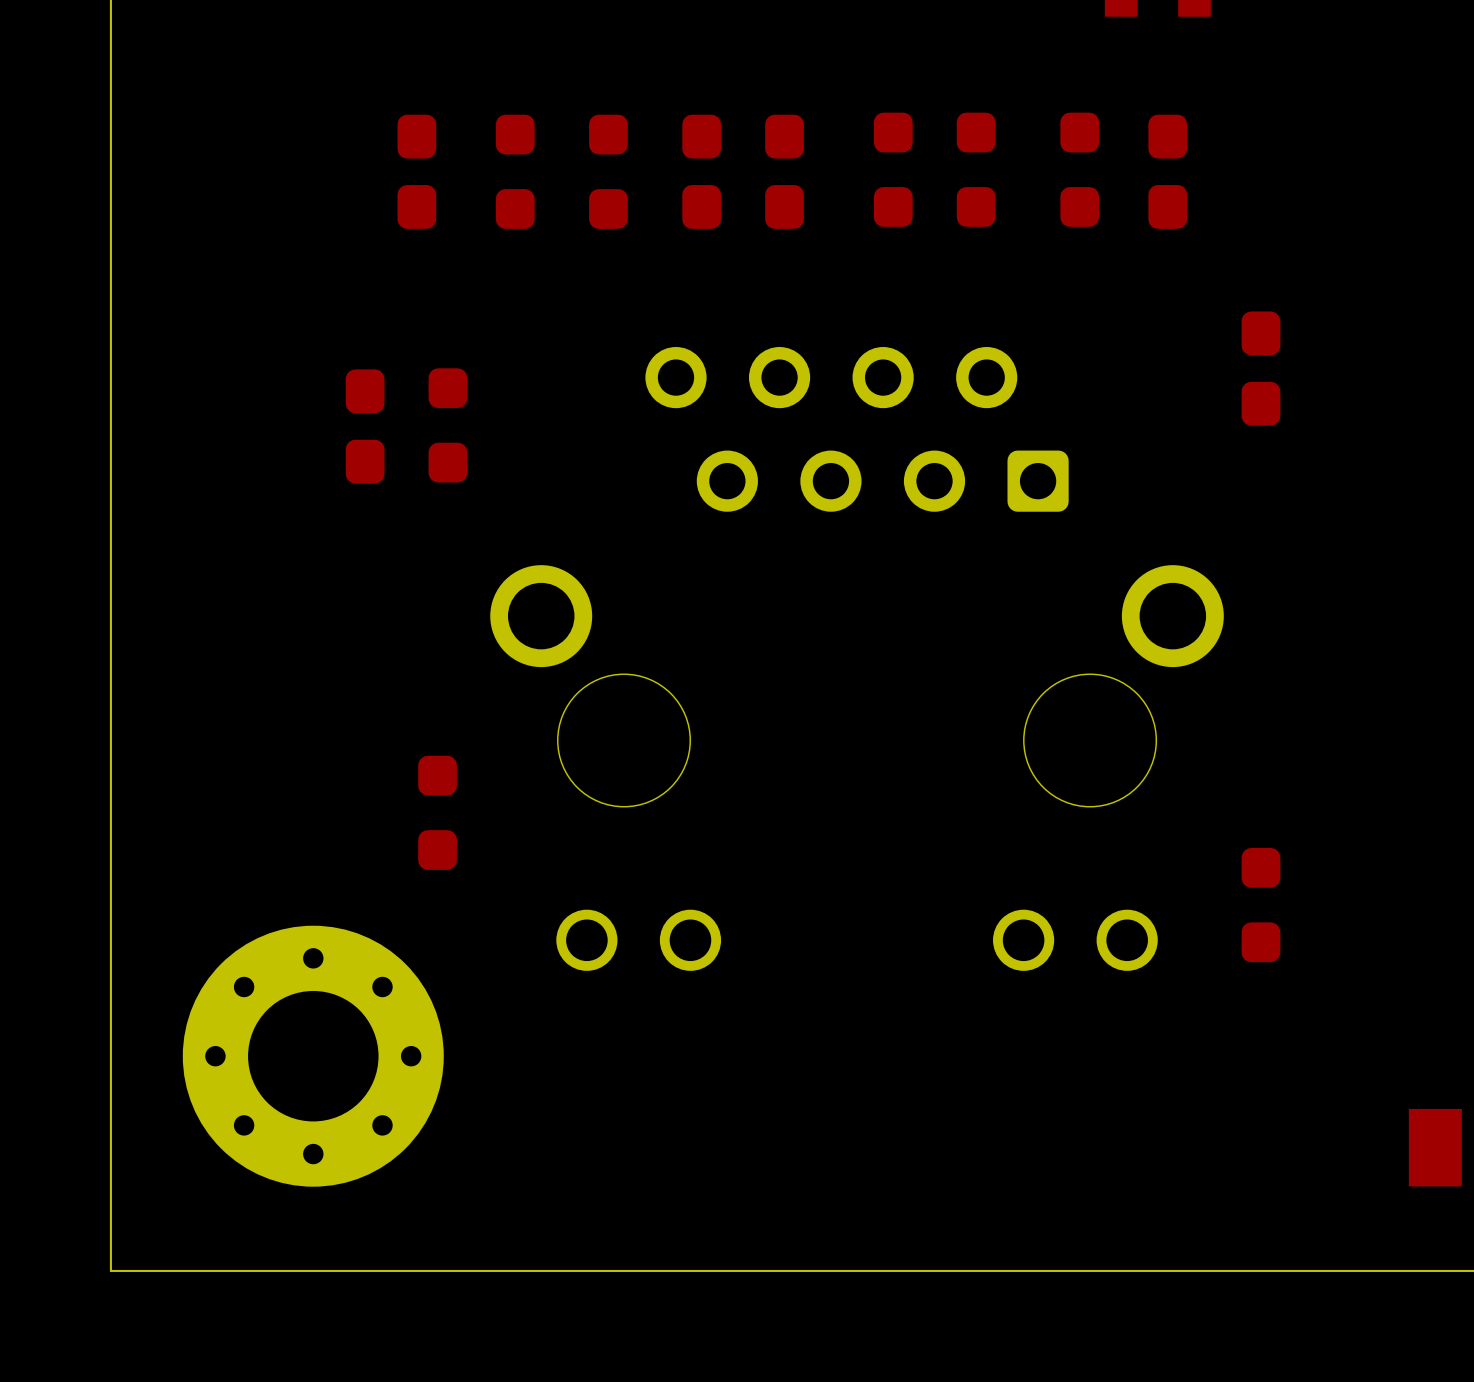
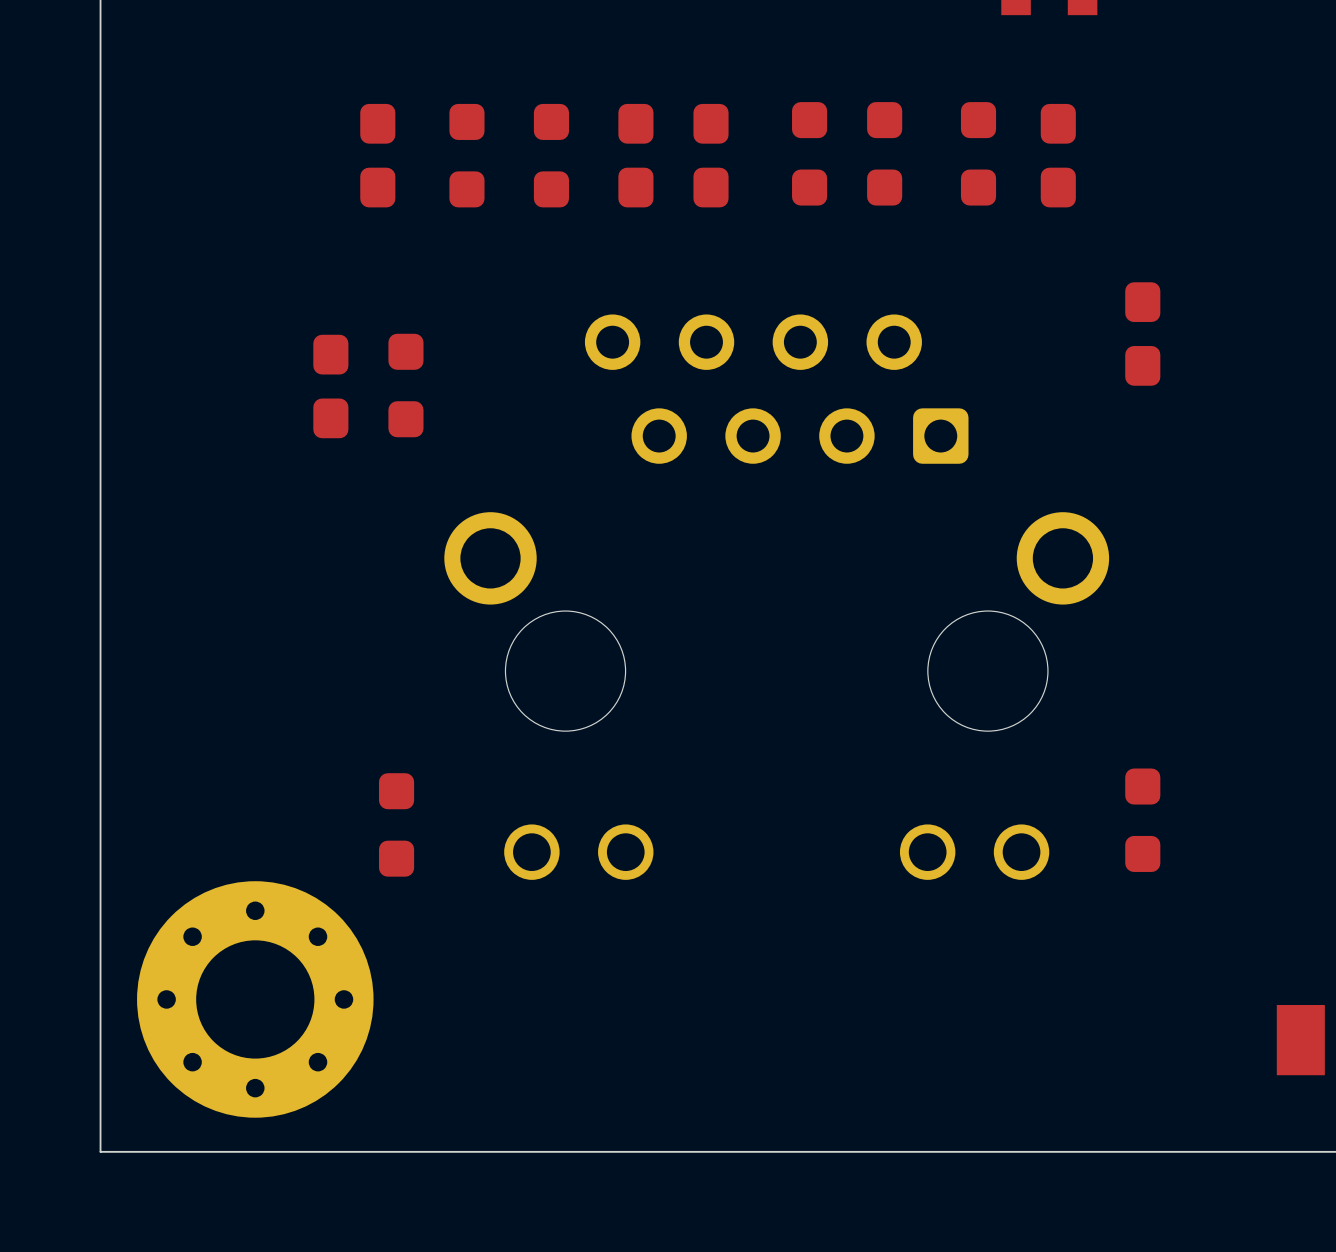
part position: (437, 812) -> (396, 824)
part position: (313, 1056) -> (255, 999)

